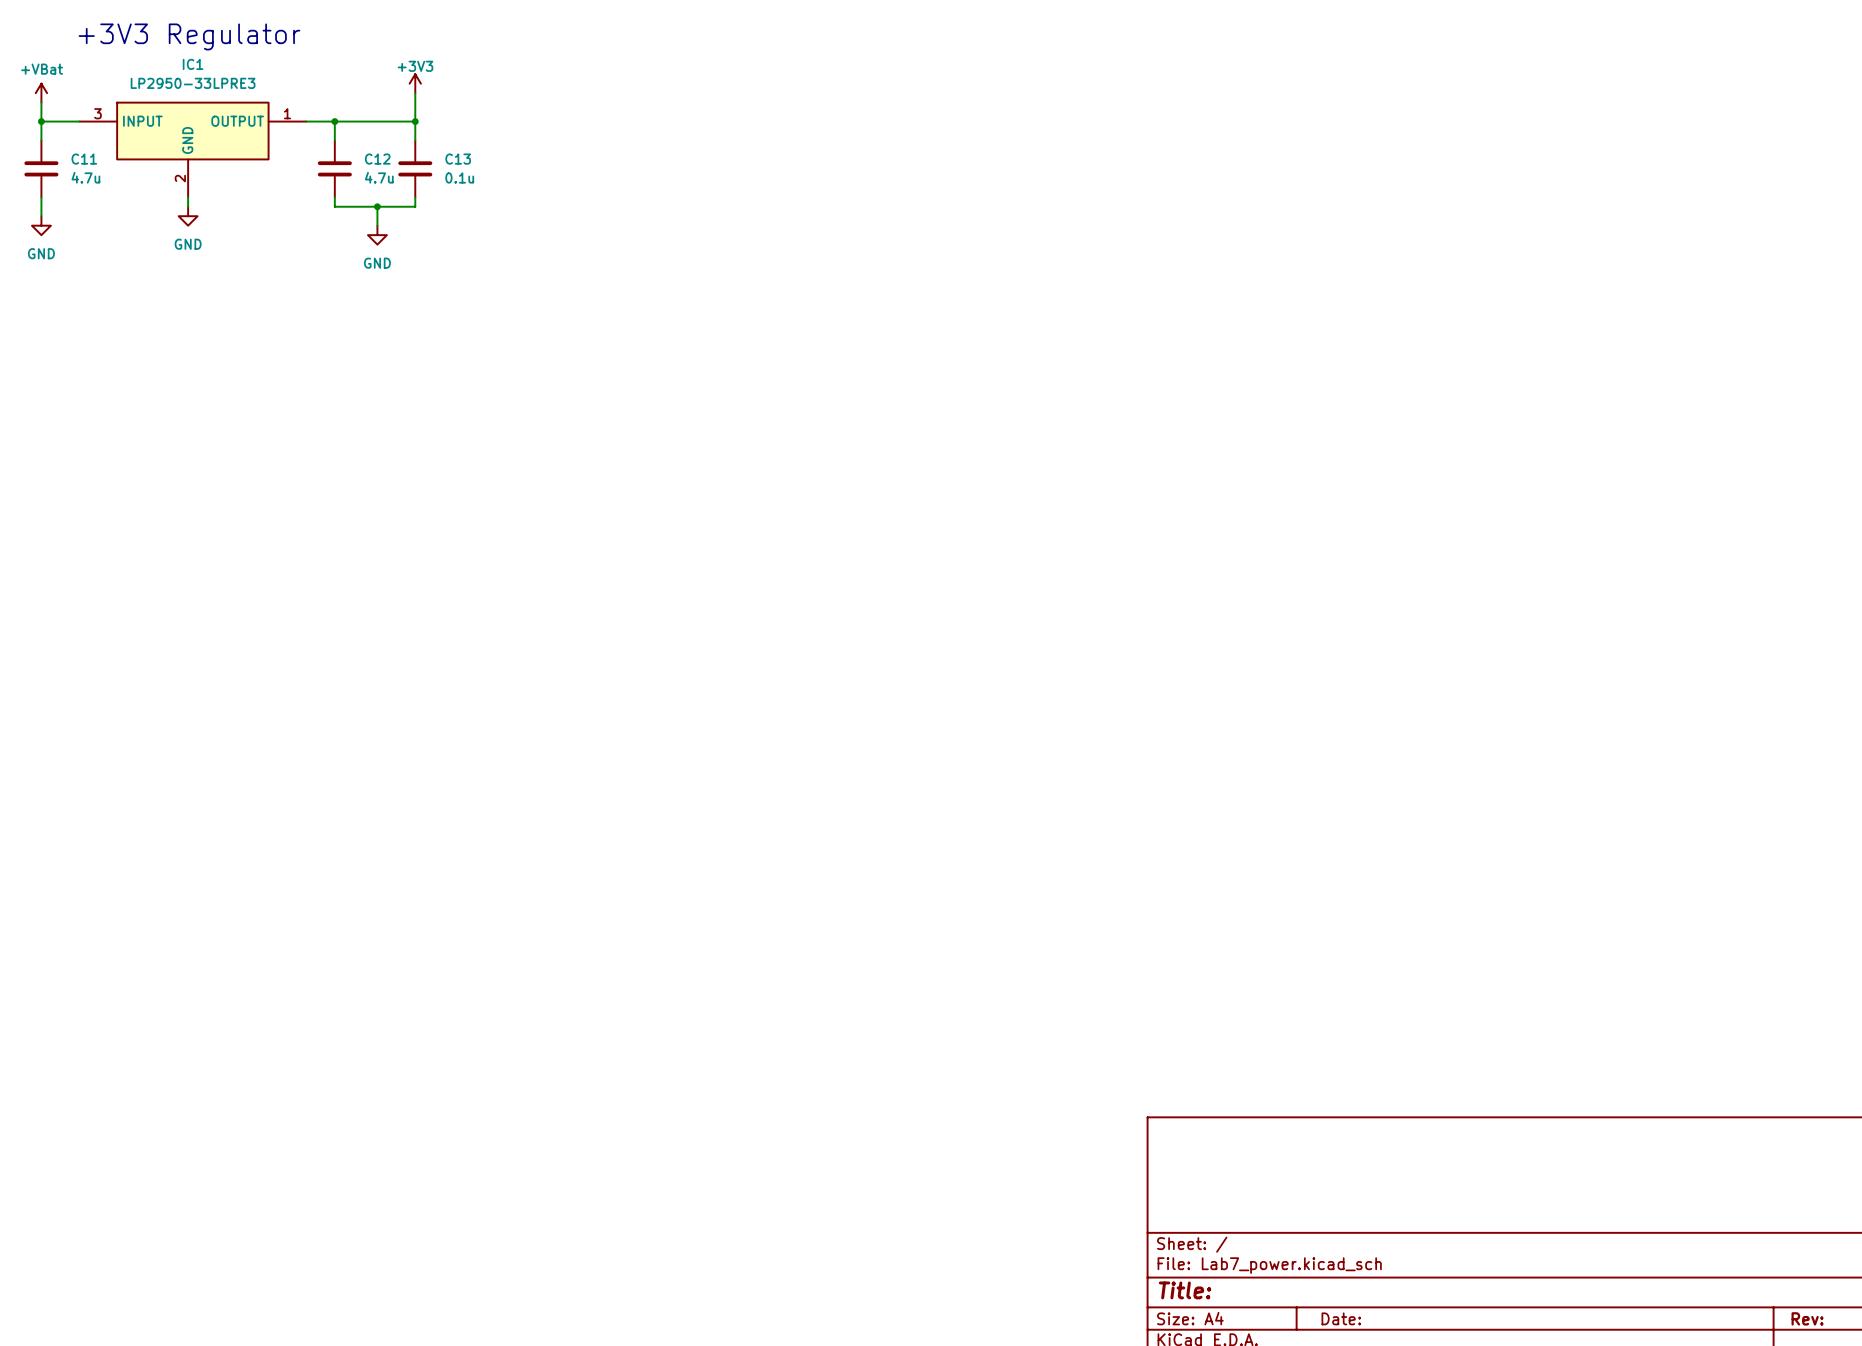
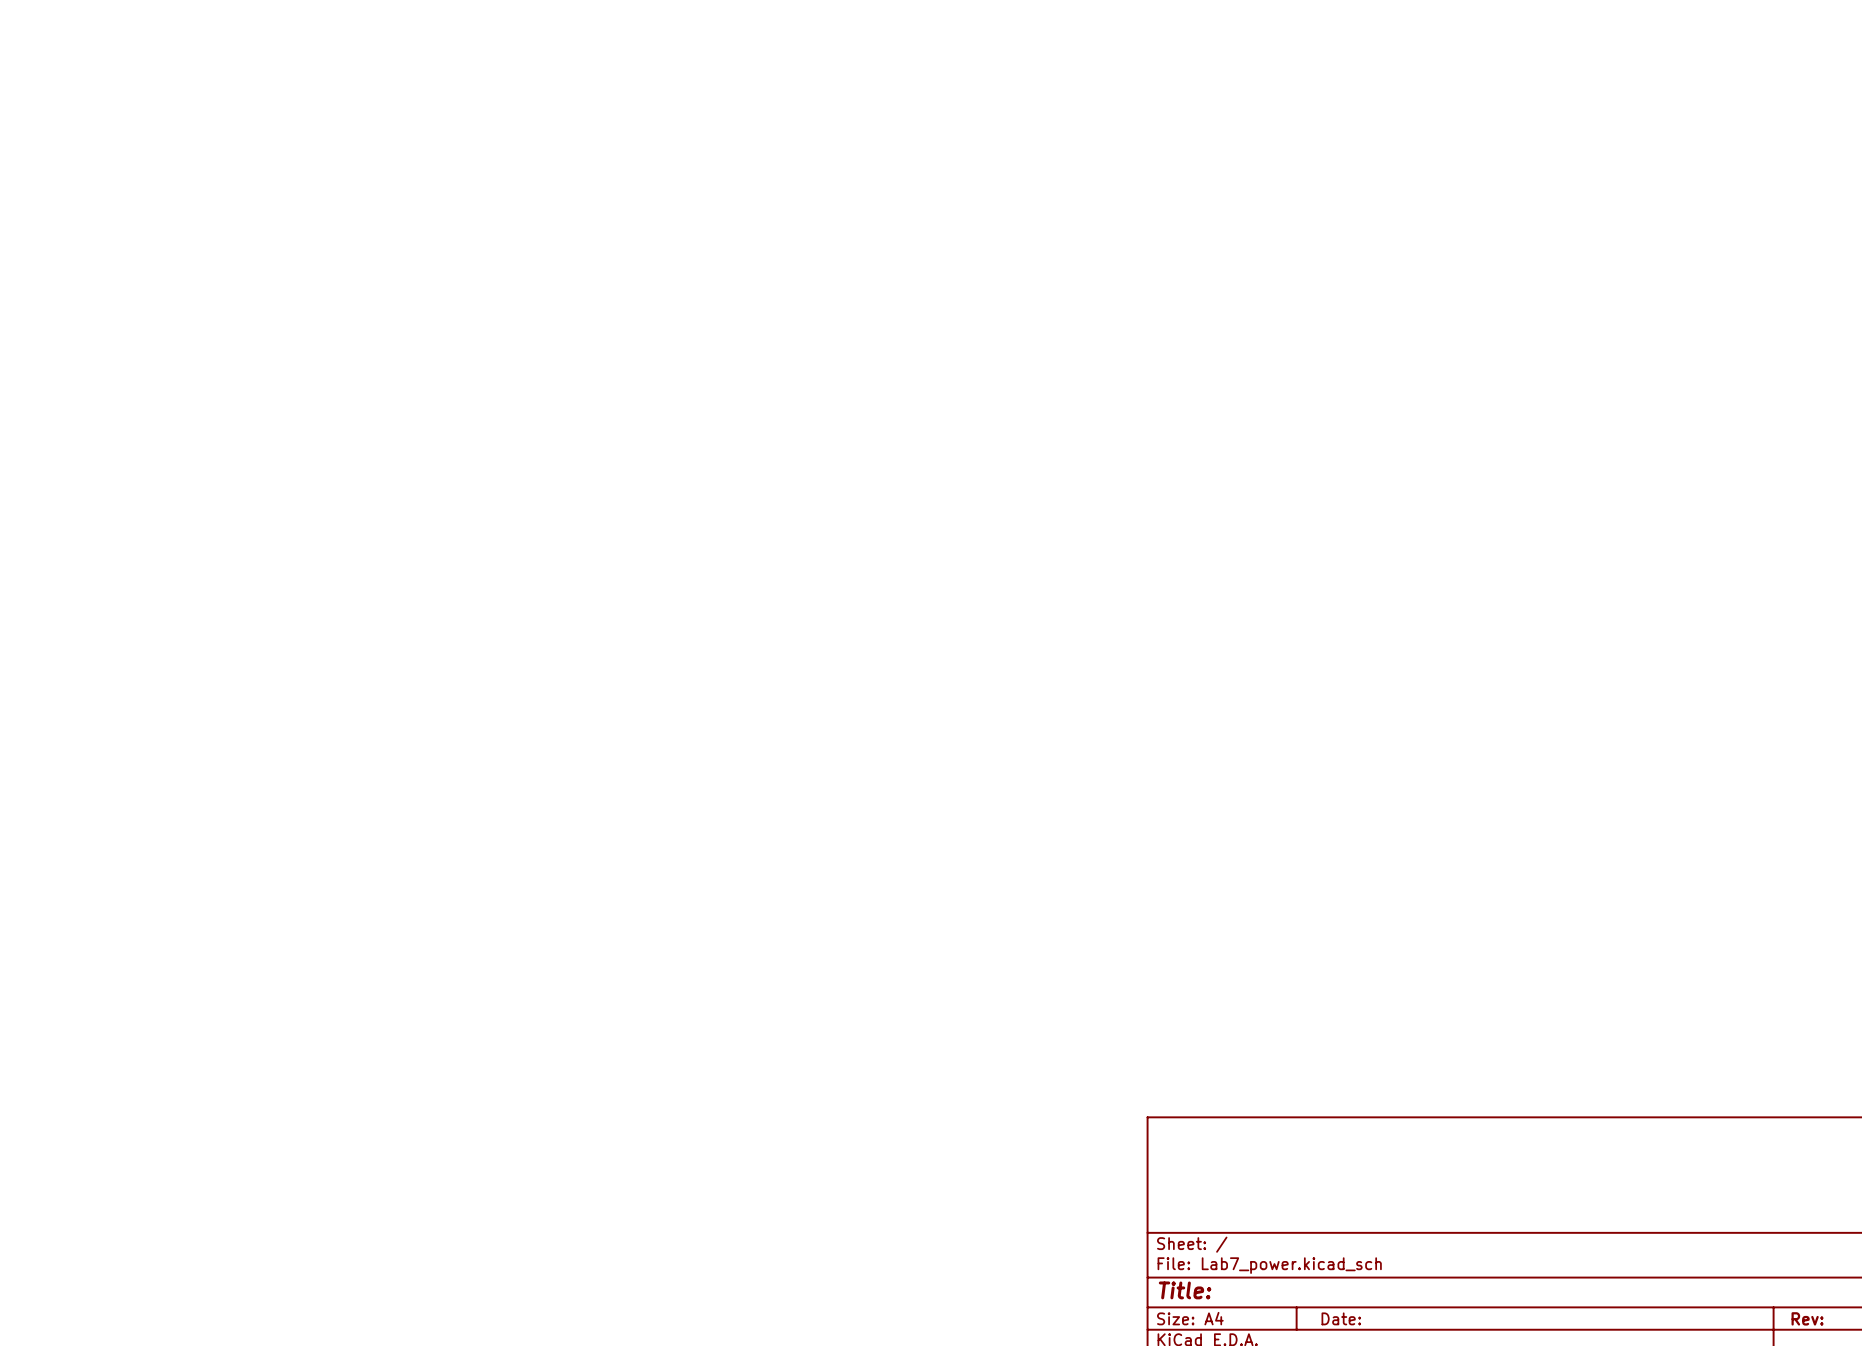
text: +3V3 Regulator (189, 36) -> none
power symbol: +3V3 (415, 83) -> none
power symbol: +VBat (41, 93) -> none
wire: (415, 93) (415, 140) -> none
wire: (41, 102) (41, 140) -> none
wire: (41, 121) (79, 121) -> none
junction: (41, 121) -> none
wire: (306, 121) (415, 121) -> none
wire: (334, 121) (334, 140) -> none
junction: (334, 121) -> none
junction: (415, 121) -> none
IC1: LP2950-33LPRE3 (192, 149) -> none
C11: 4.7u (41, 168) -> none
C12: 4.7u (334, 168) -> none
C13: 0.1u (415, 168) -> none
wire: (41, 197) (41, 216) -> none
wire: (188, 197) (188, 206) -> none
wire: (334, 197) (334, 206) (415, 206) (415, 197) -> none
wire: (377, 206) (377, 225) -> none
junction: (377, 206) -> none
power symbol: GND (188, 216) -> none
power symbol: GND (41, 225) -> none
power symbol: GND (377, 235) -> none

